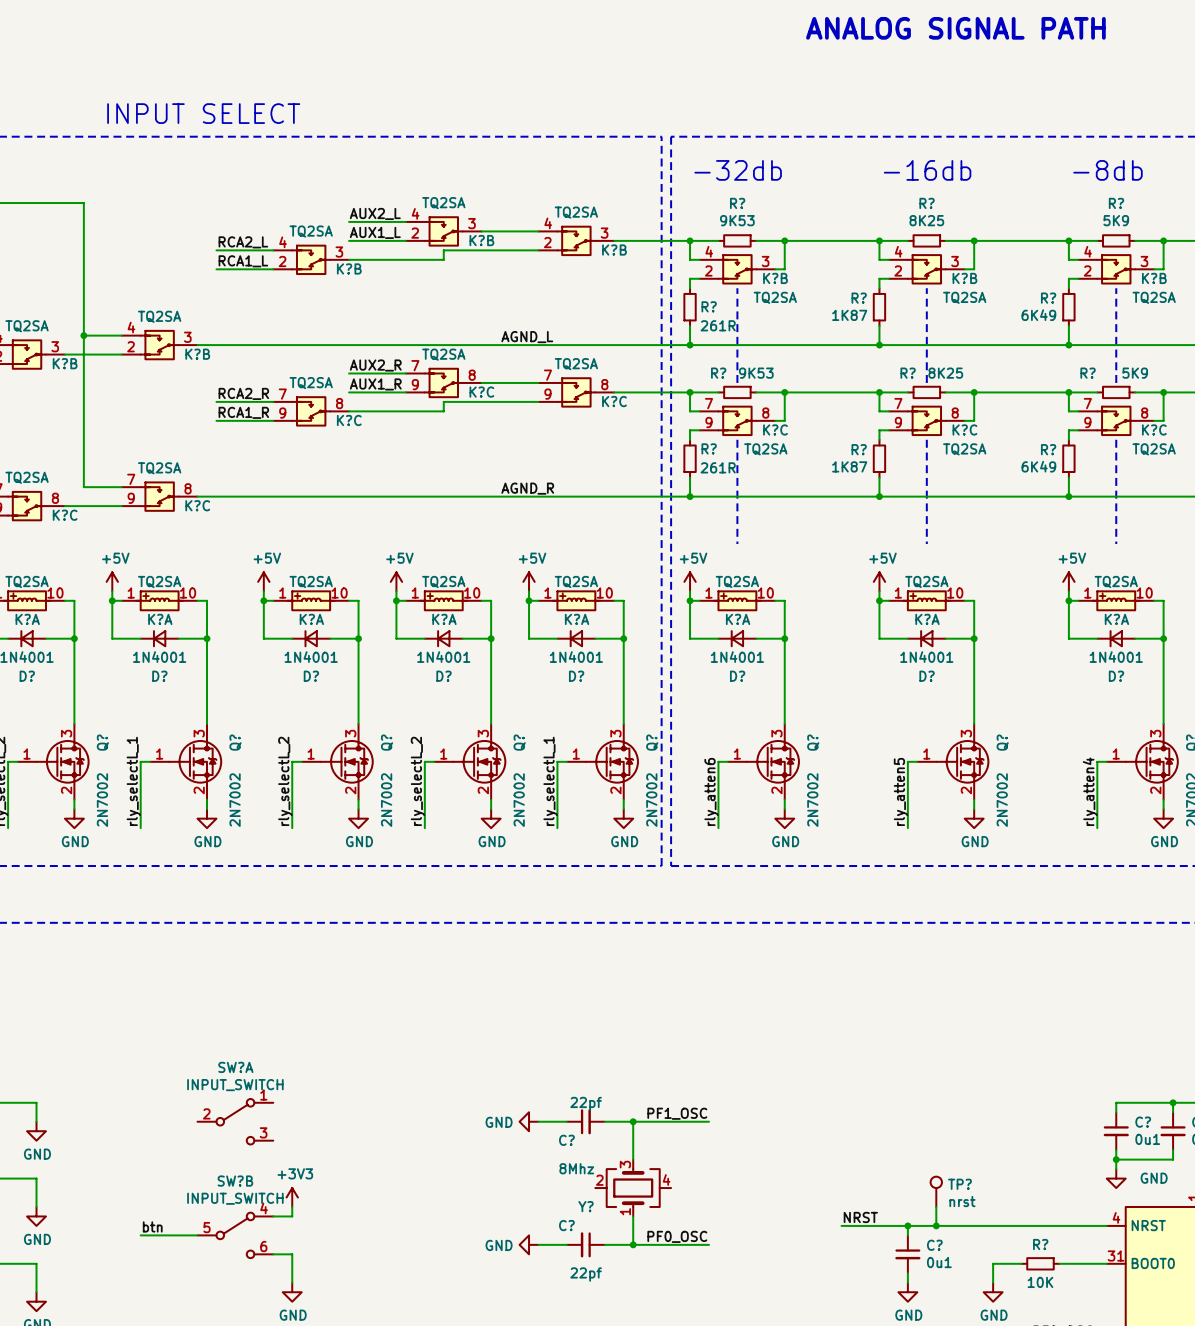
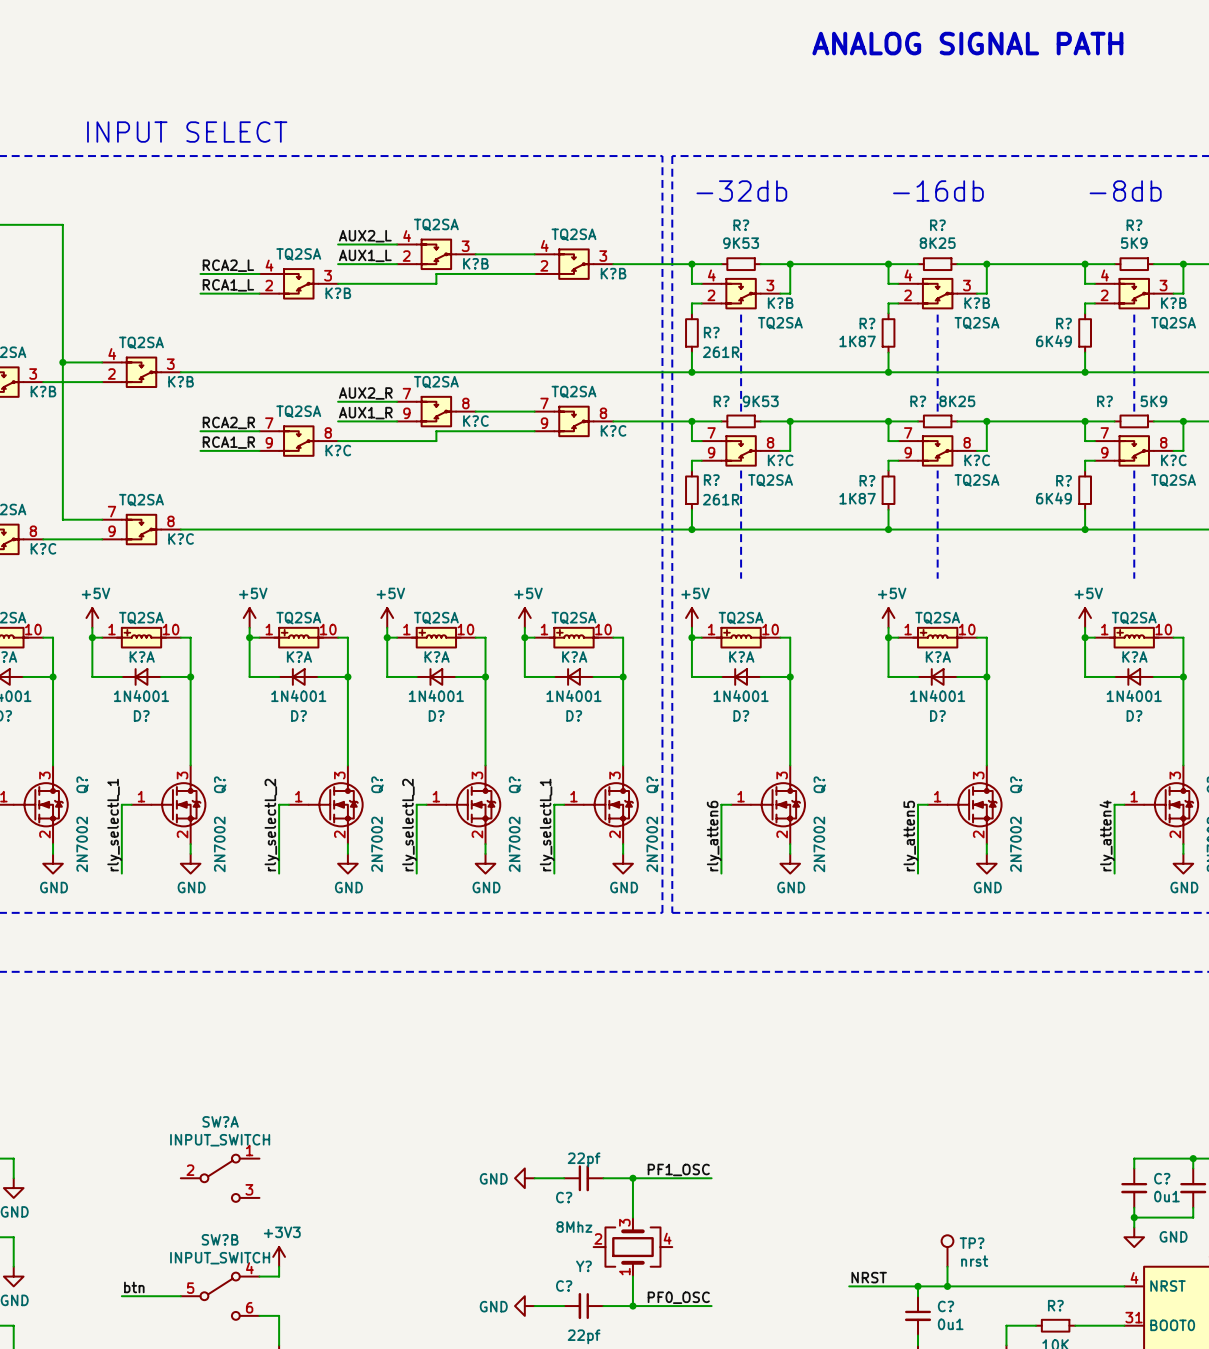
label: AGND_L (527, 337) -> none
label: AGND_R (527, 488) -> none

